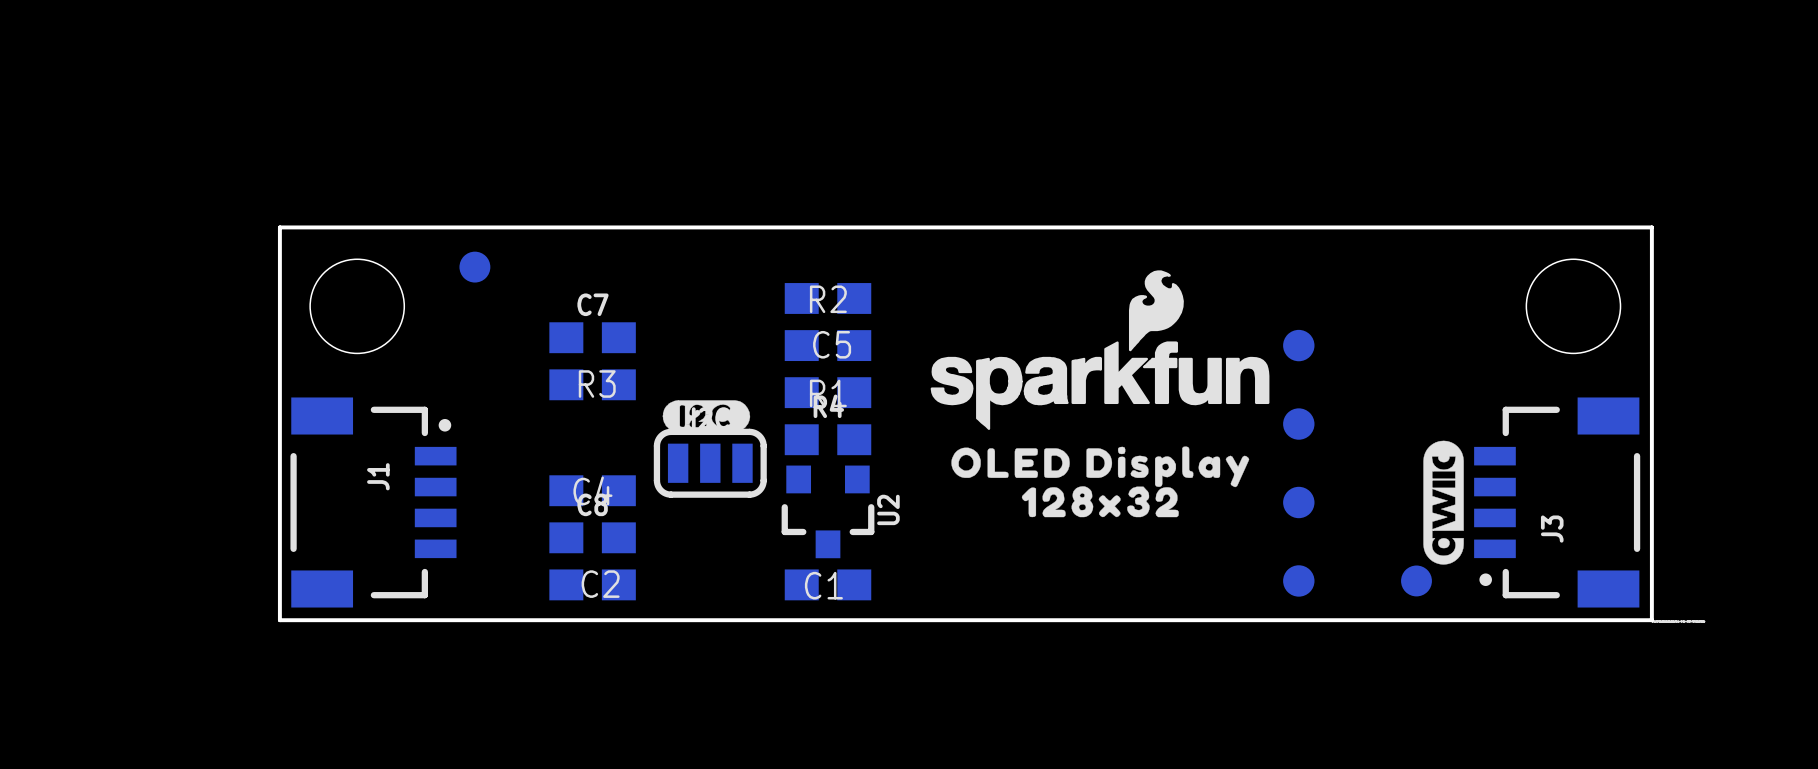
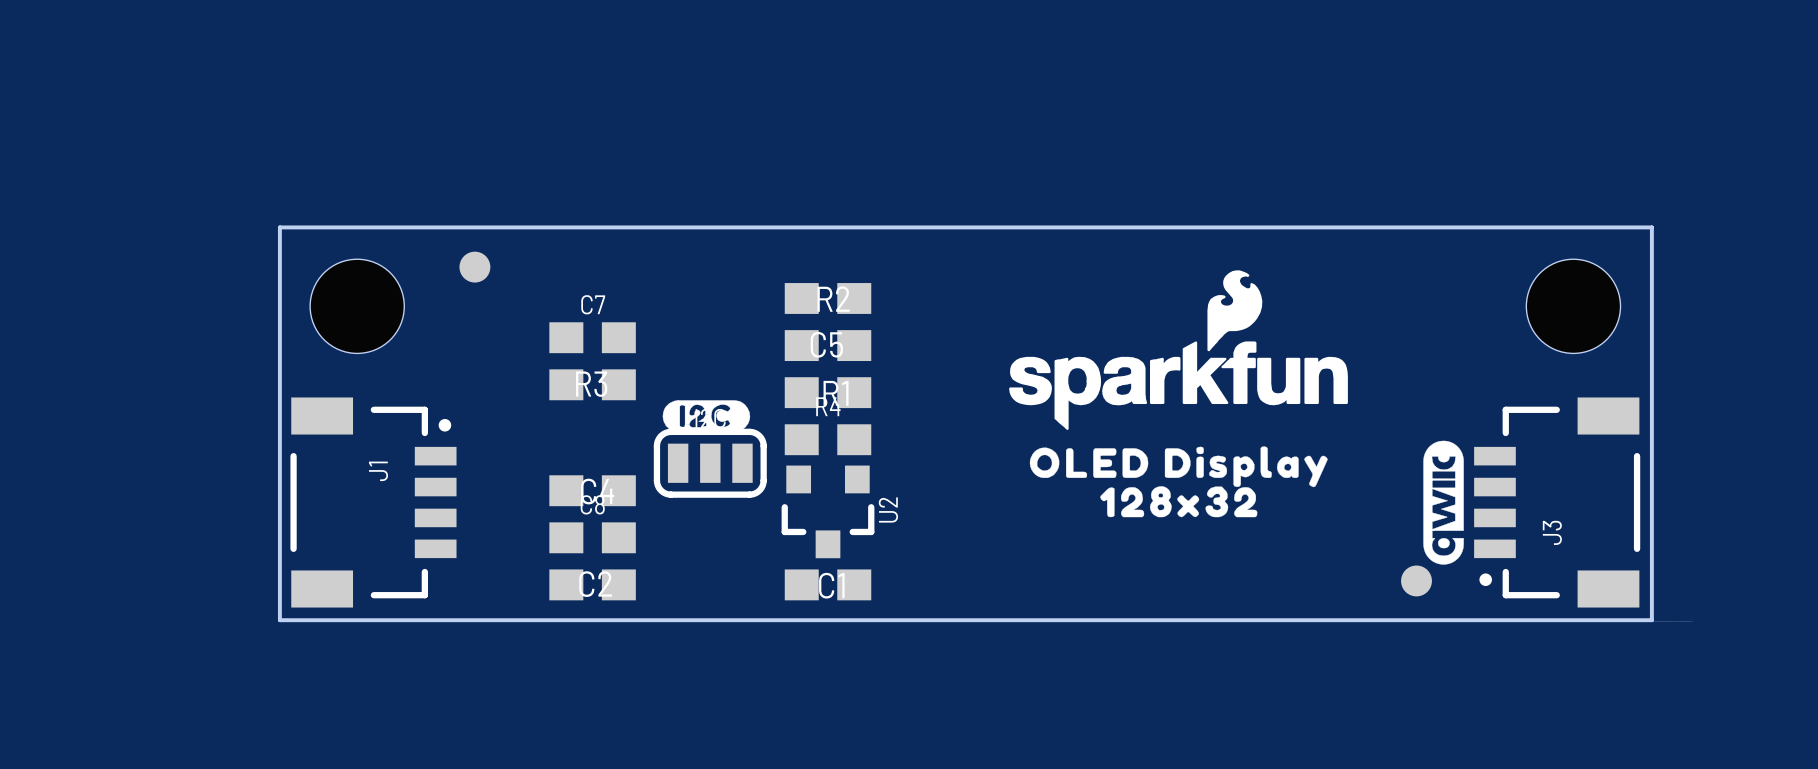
part: (1298, 345) -> none
drawing position: (1100, 350) -> (1178, 350)
part: (1298, 424) -> none
drawing position: (1100, 466) -> (1178, 466)
drawing position: (1100, 501) -> (1178, 501)
part: (1298, 502) -> none
part: (1298, 580) -> none

